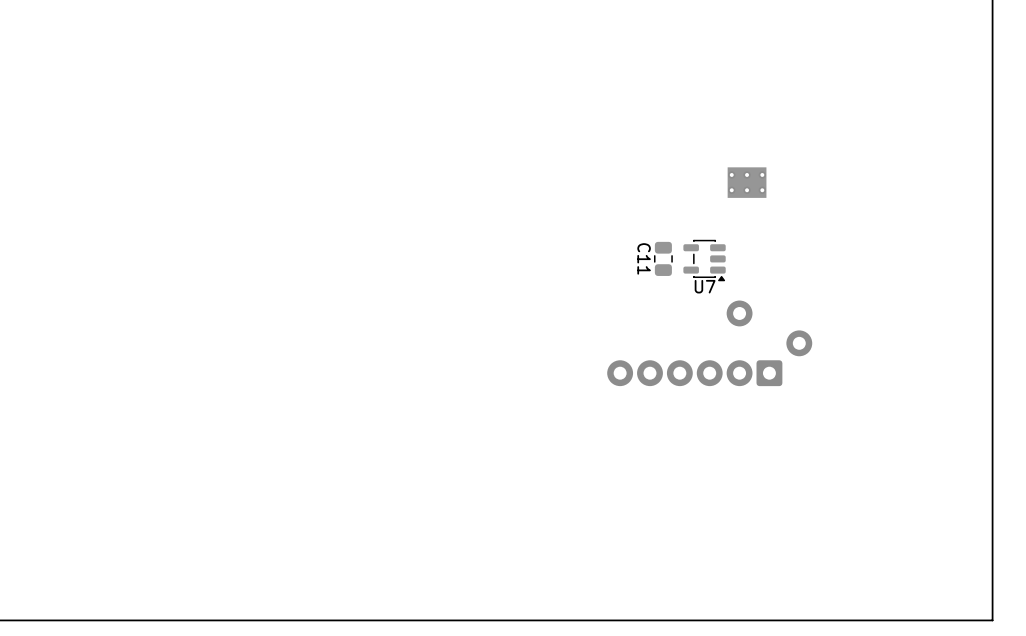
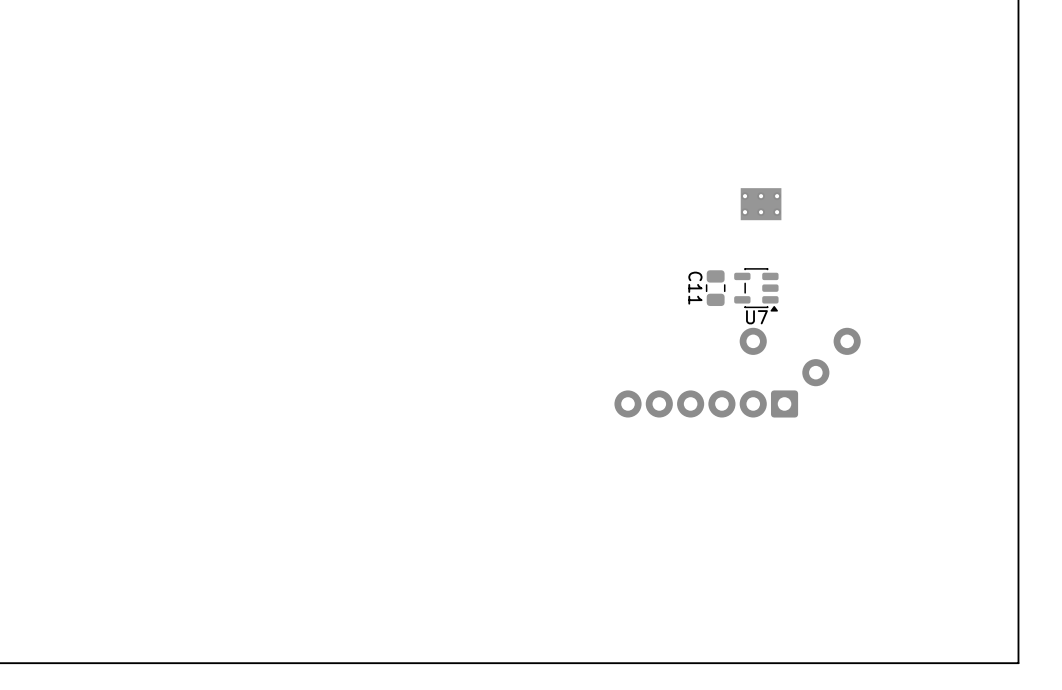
C11 position: (663, 258) -> (715, 288)
U7 position: (704, 260) -> (756, 289)
part: none -> (847, 341)

